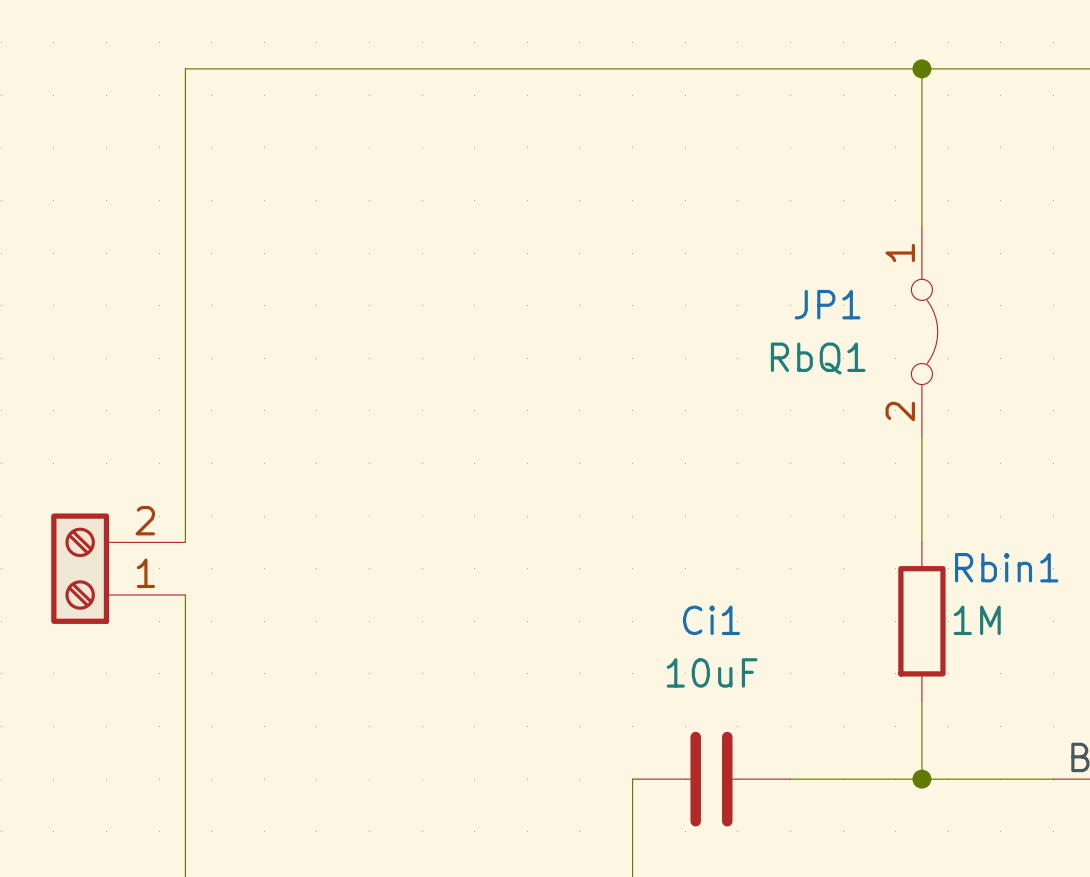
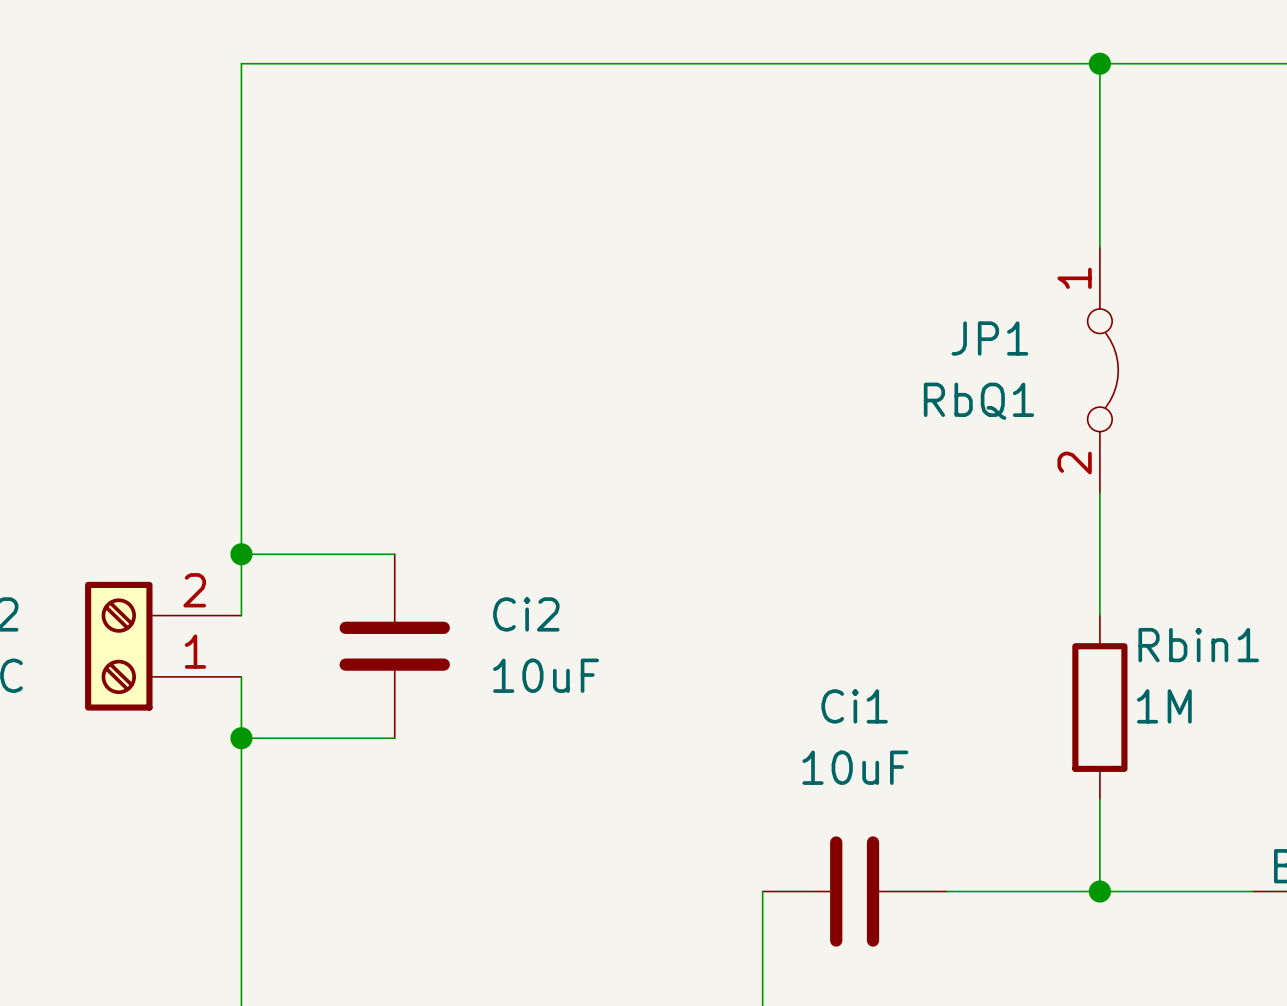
wire: none -> (241, 554) (394, 554)
junction: none -> (241, 554)
Ci2: none -> 10uF (394, 646)
wire: none -> (241, 738) (394, 738)
junction: none -> (241, 738)

